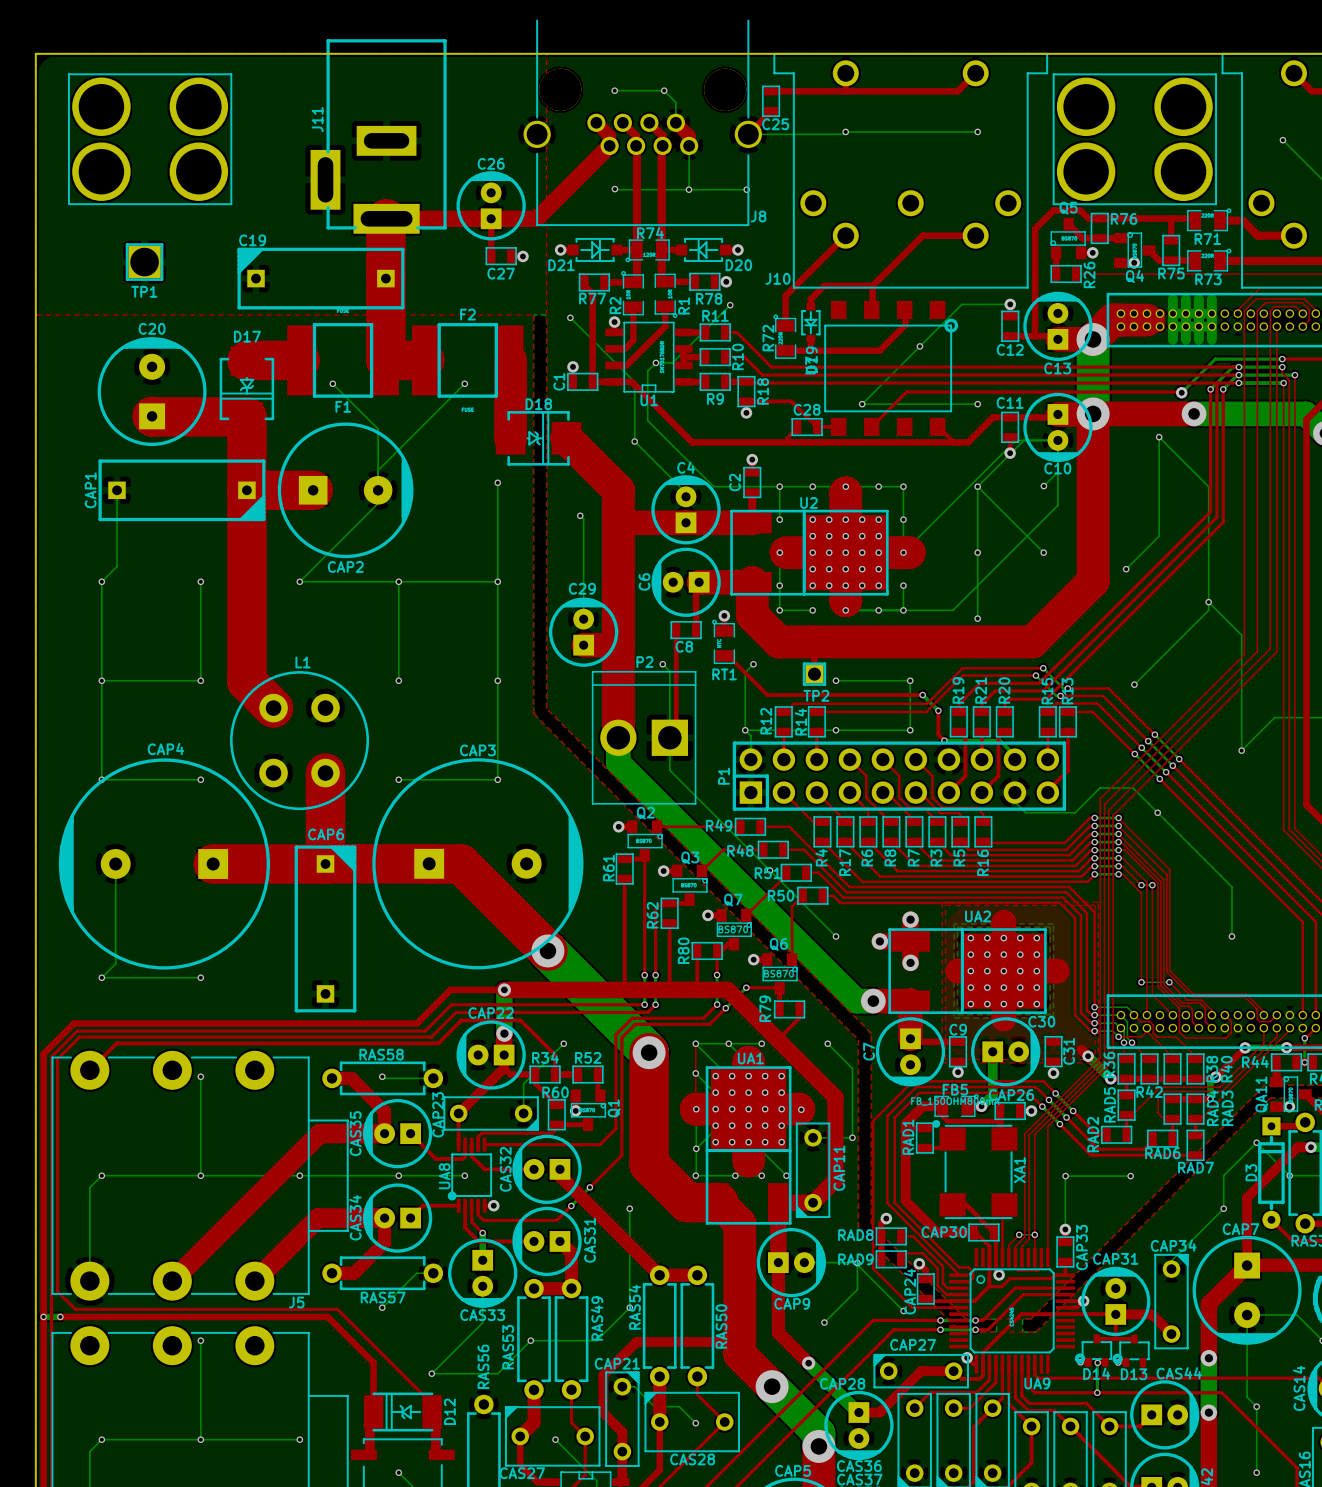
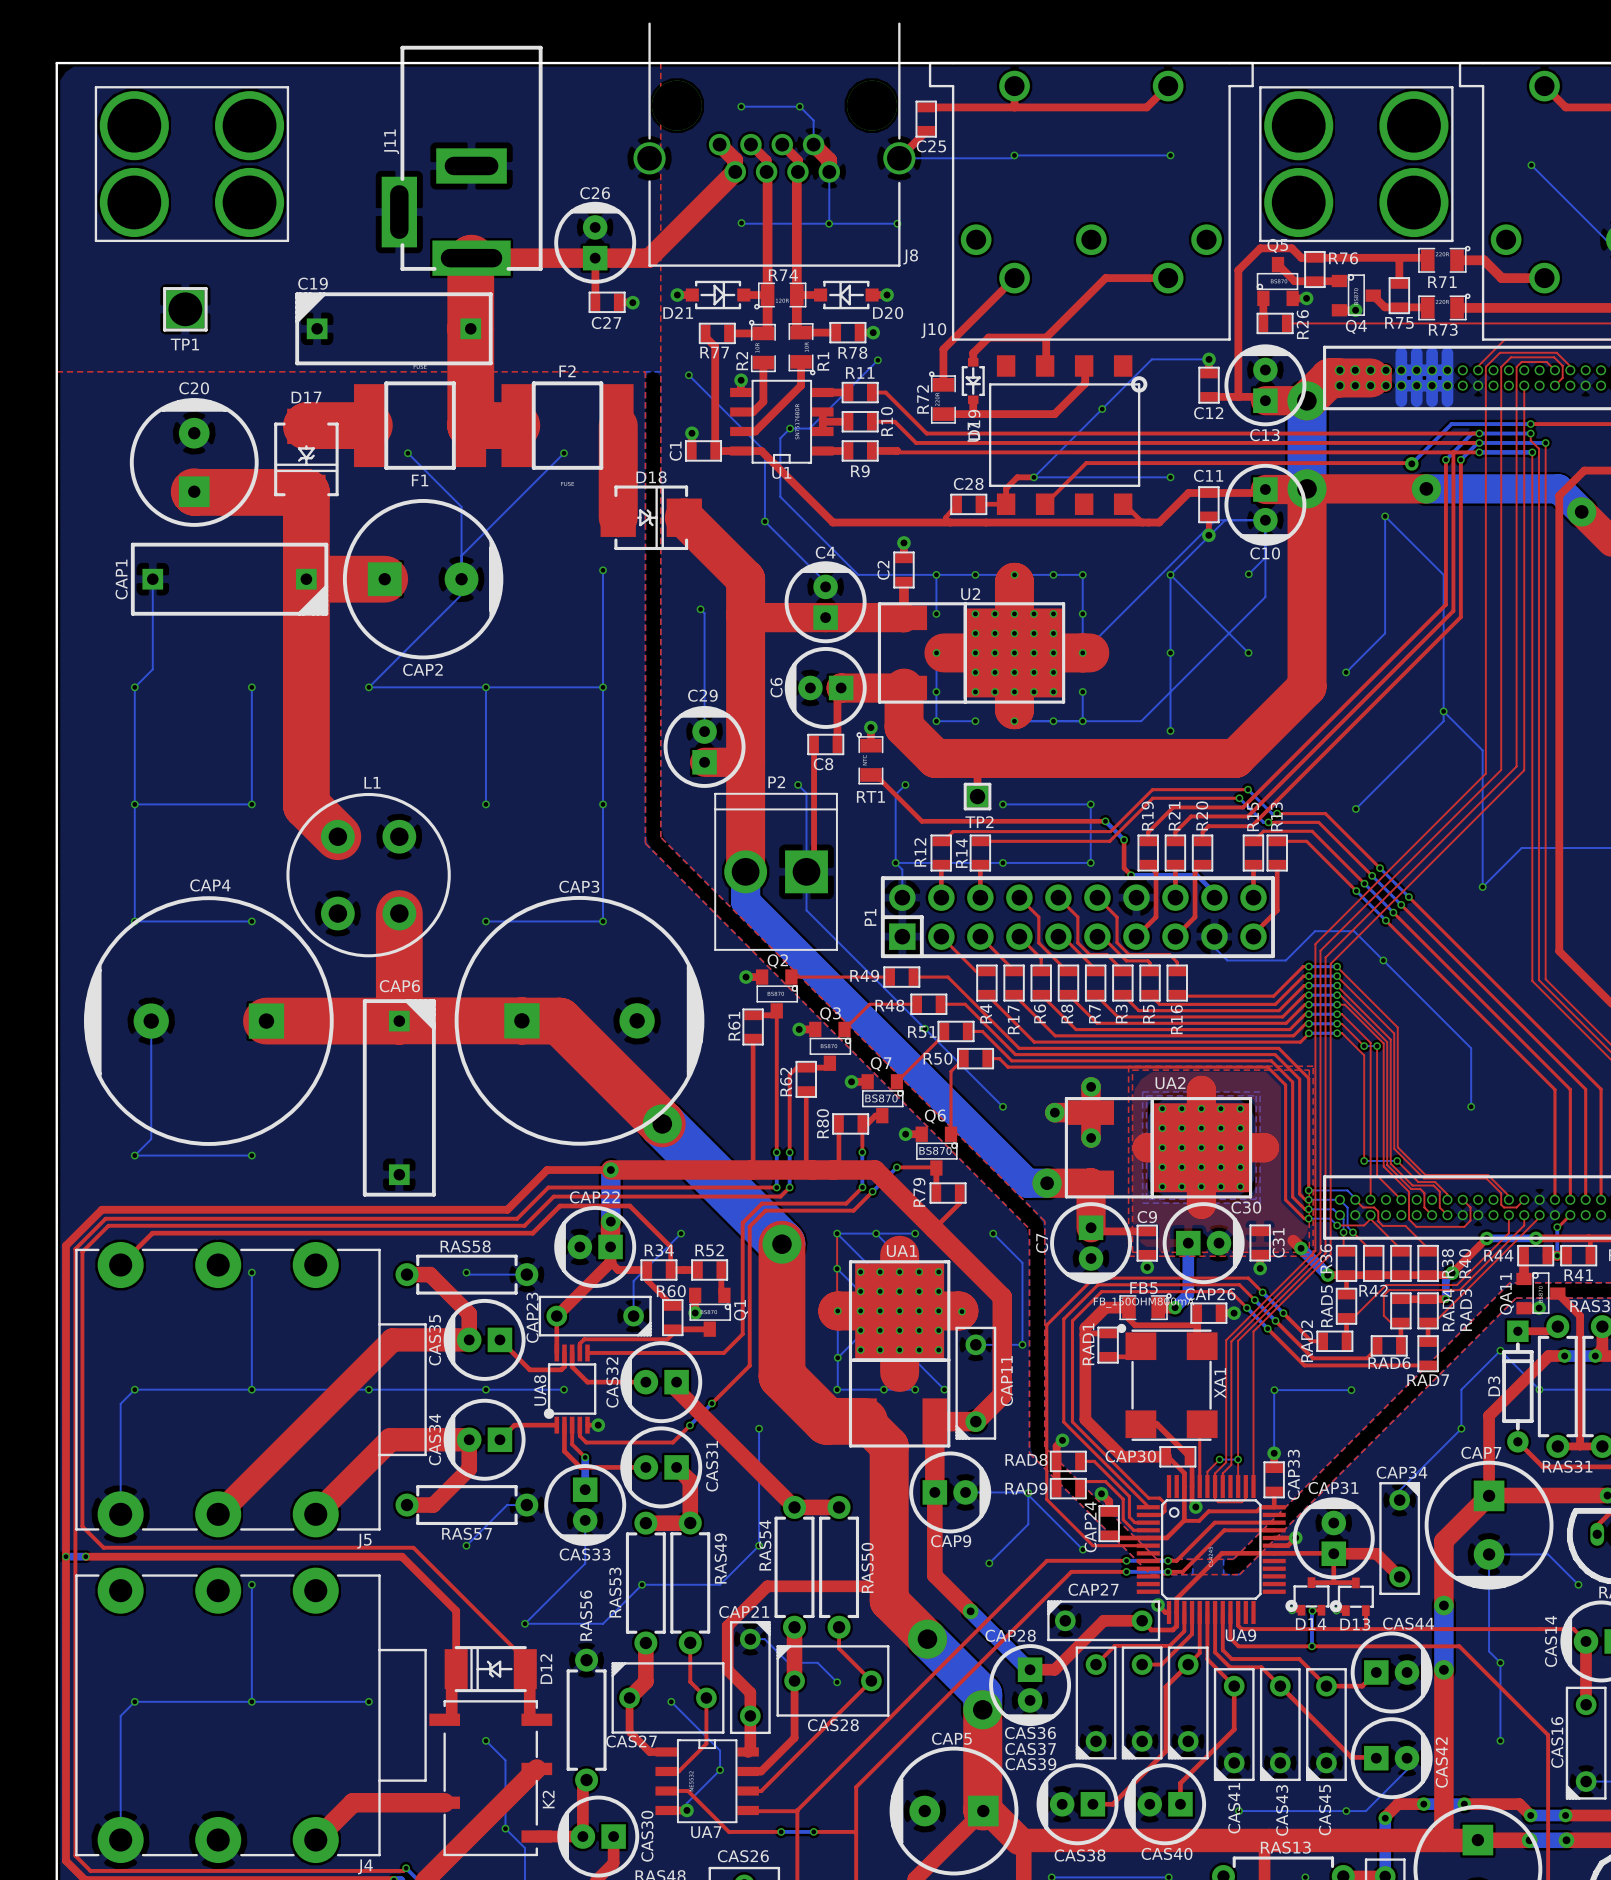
R18: (746, 391) -> none
top track: none -> (1033, 477) (1017, 477) (1006, 488) (1006, 504)
top track: (746, 412) (746, 401) (791, 401) (816, 427) -> none
via: (746, 412) -> none

